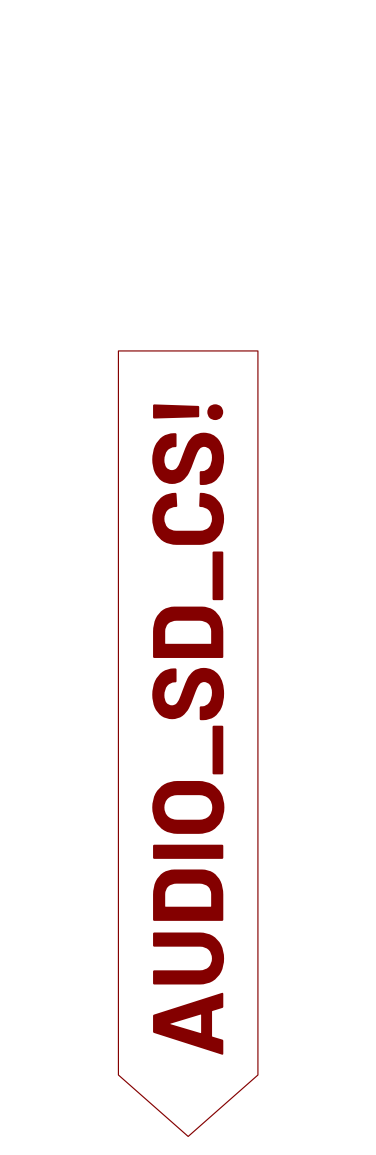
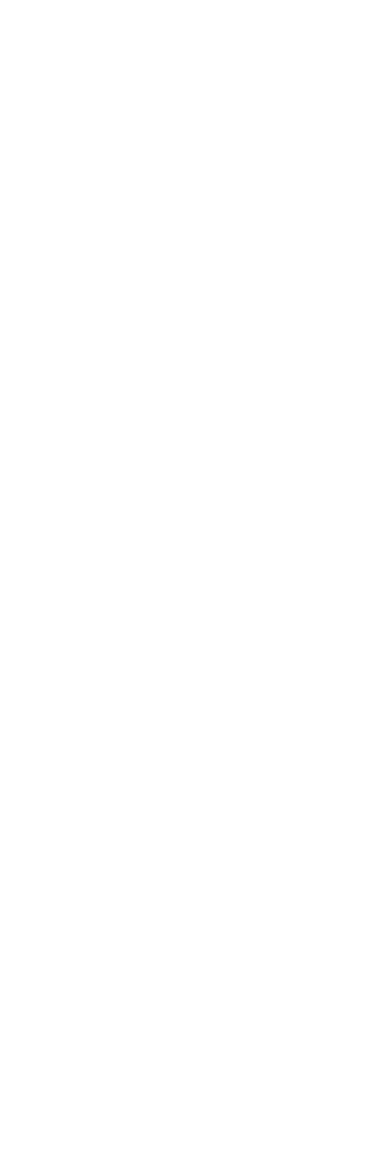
global label: AUDIO_SD_CS! (188, 729) -> none

